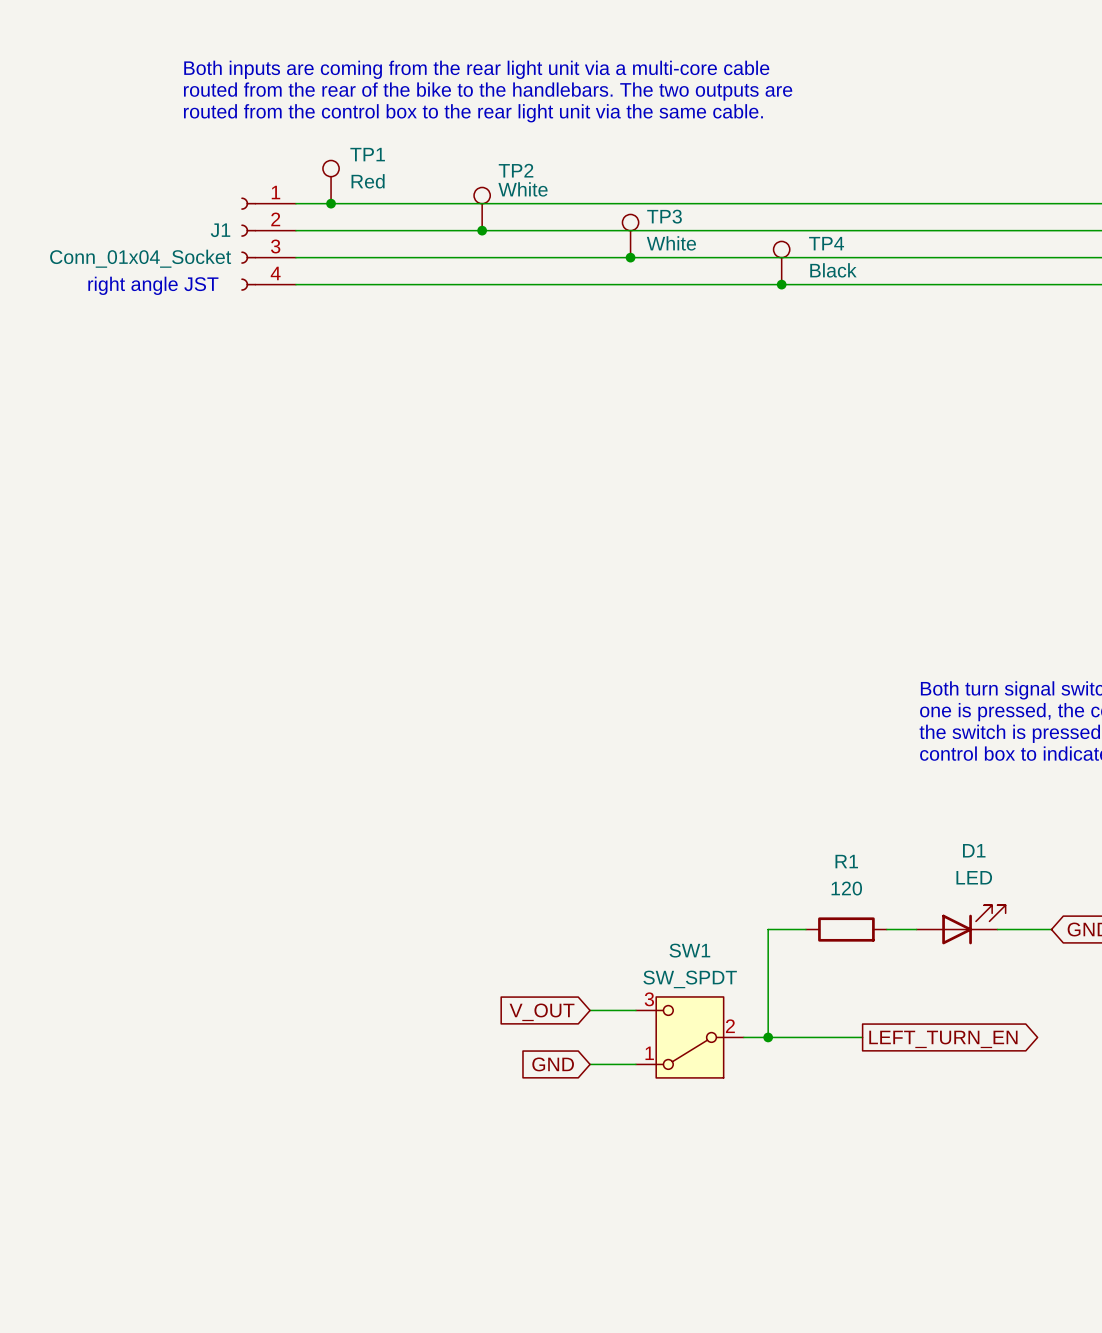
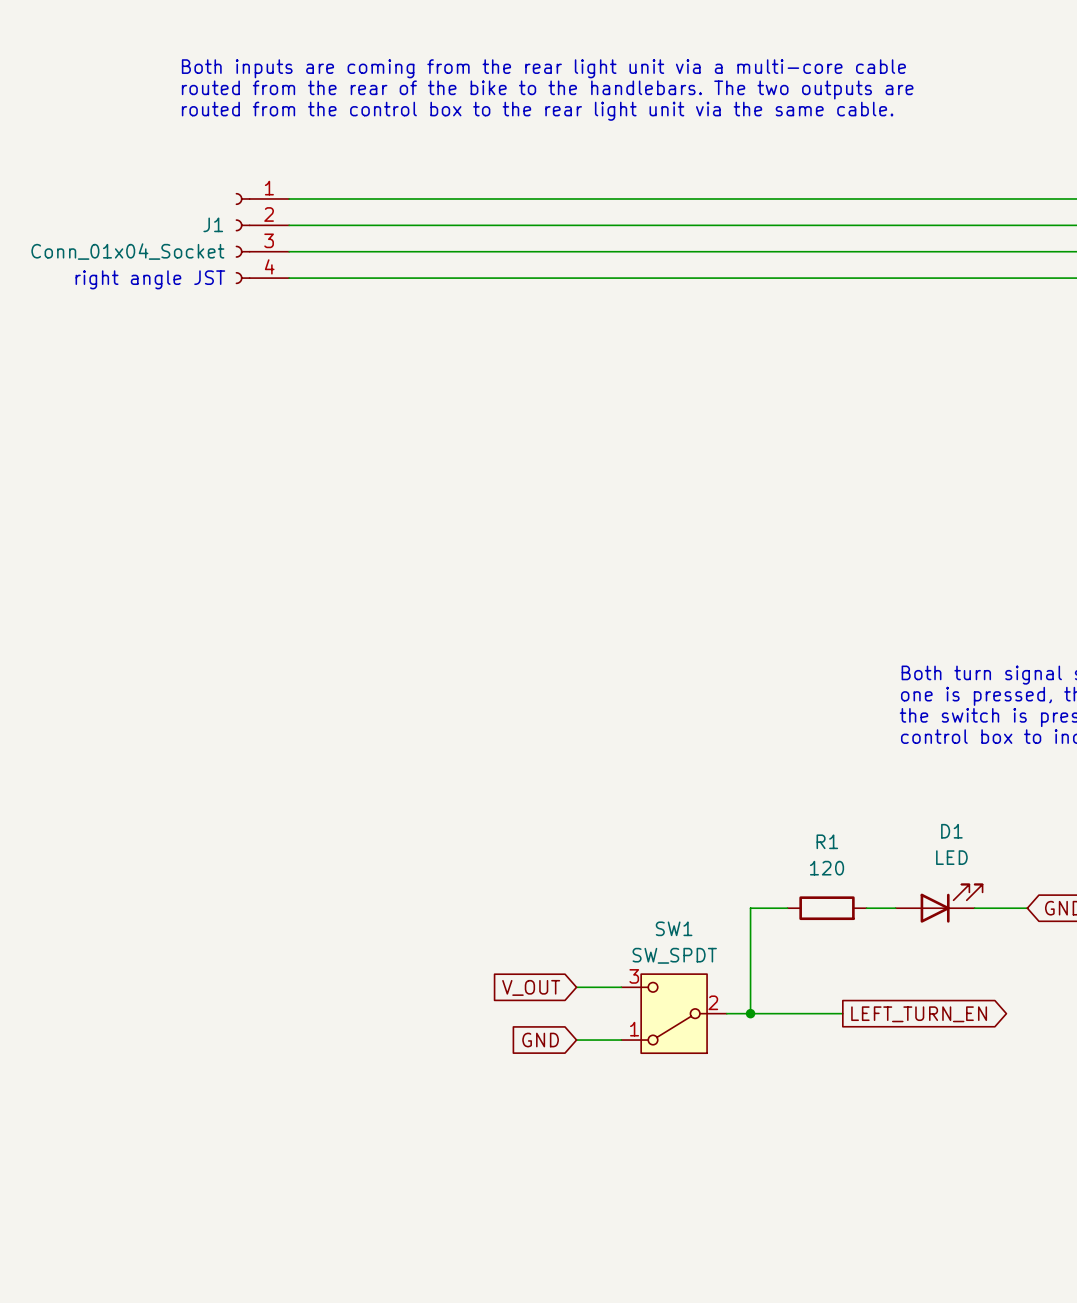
TP1: Red (331, 182) -> none
junction: (331, 203) -> none
TP2: White (482, 209) -> none
junction: (482, 230) -> none
TP3: White (630, 236) -> none
junction: (630, 257) -> none
TP4: Black (781, 263) -> none
junction: (781, 284) -> none

